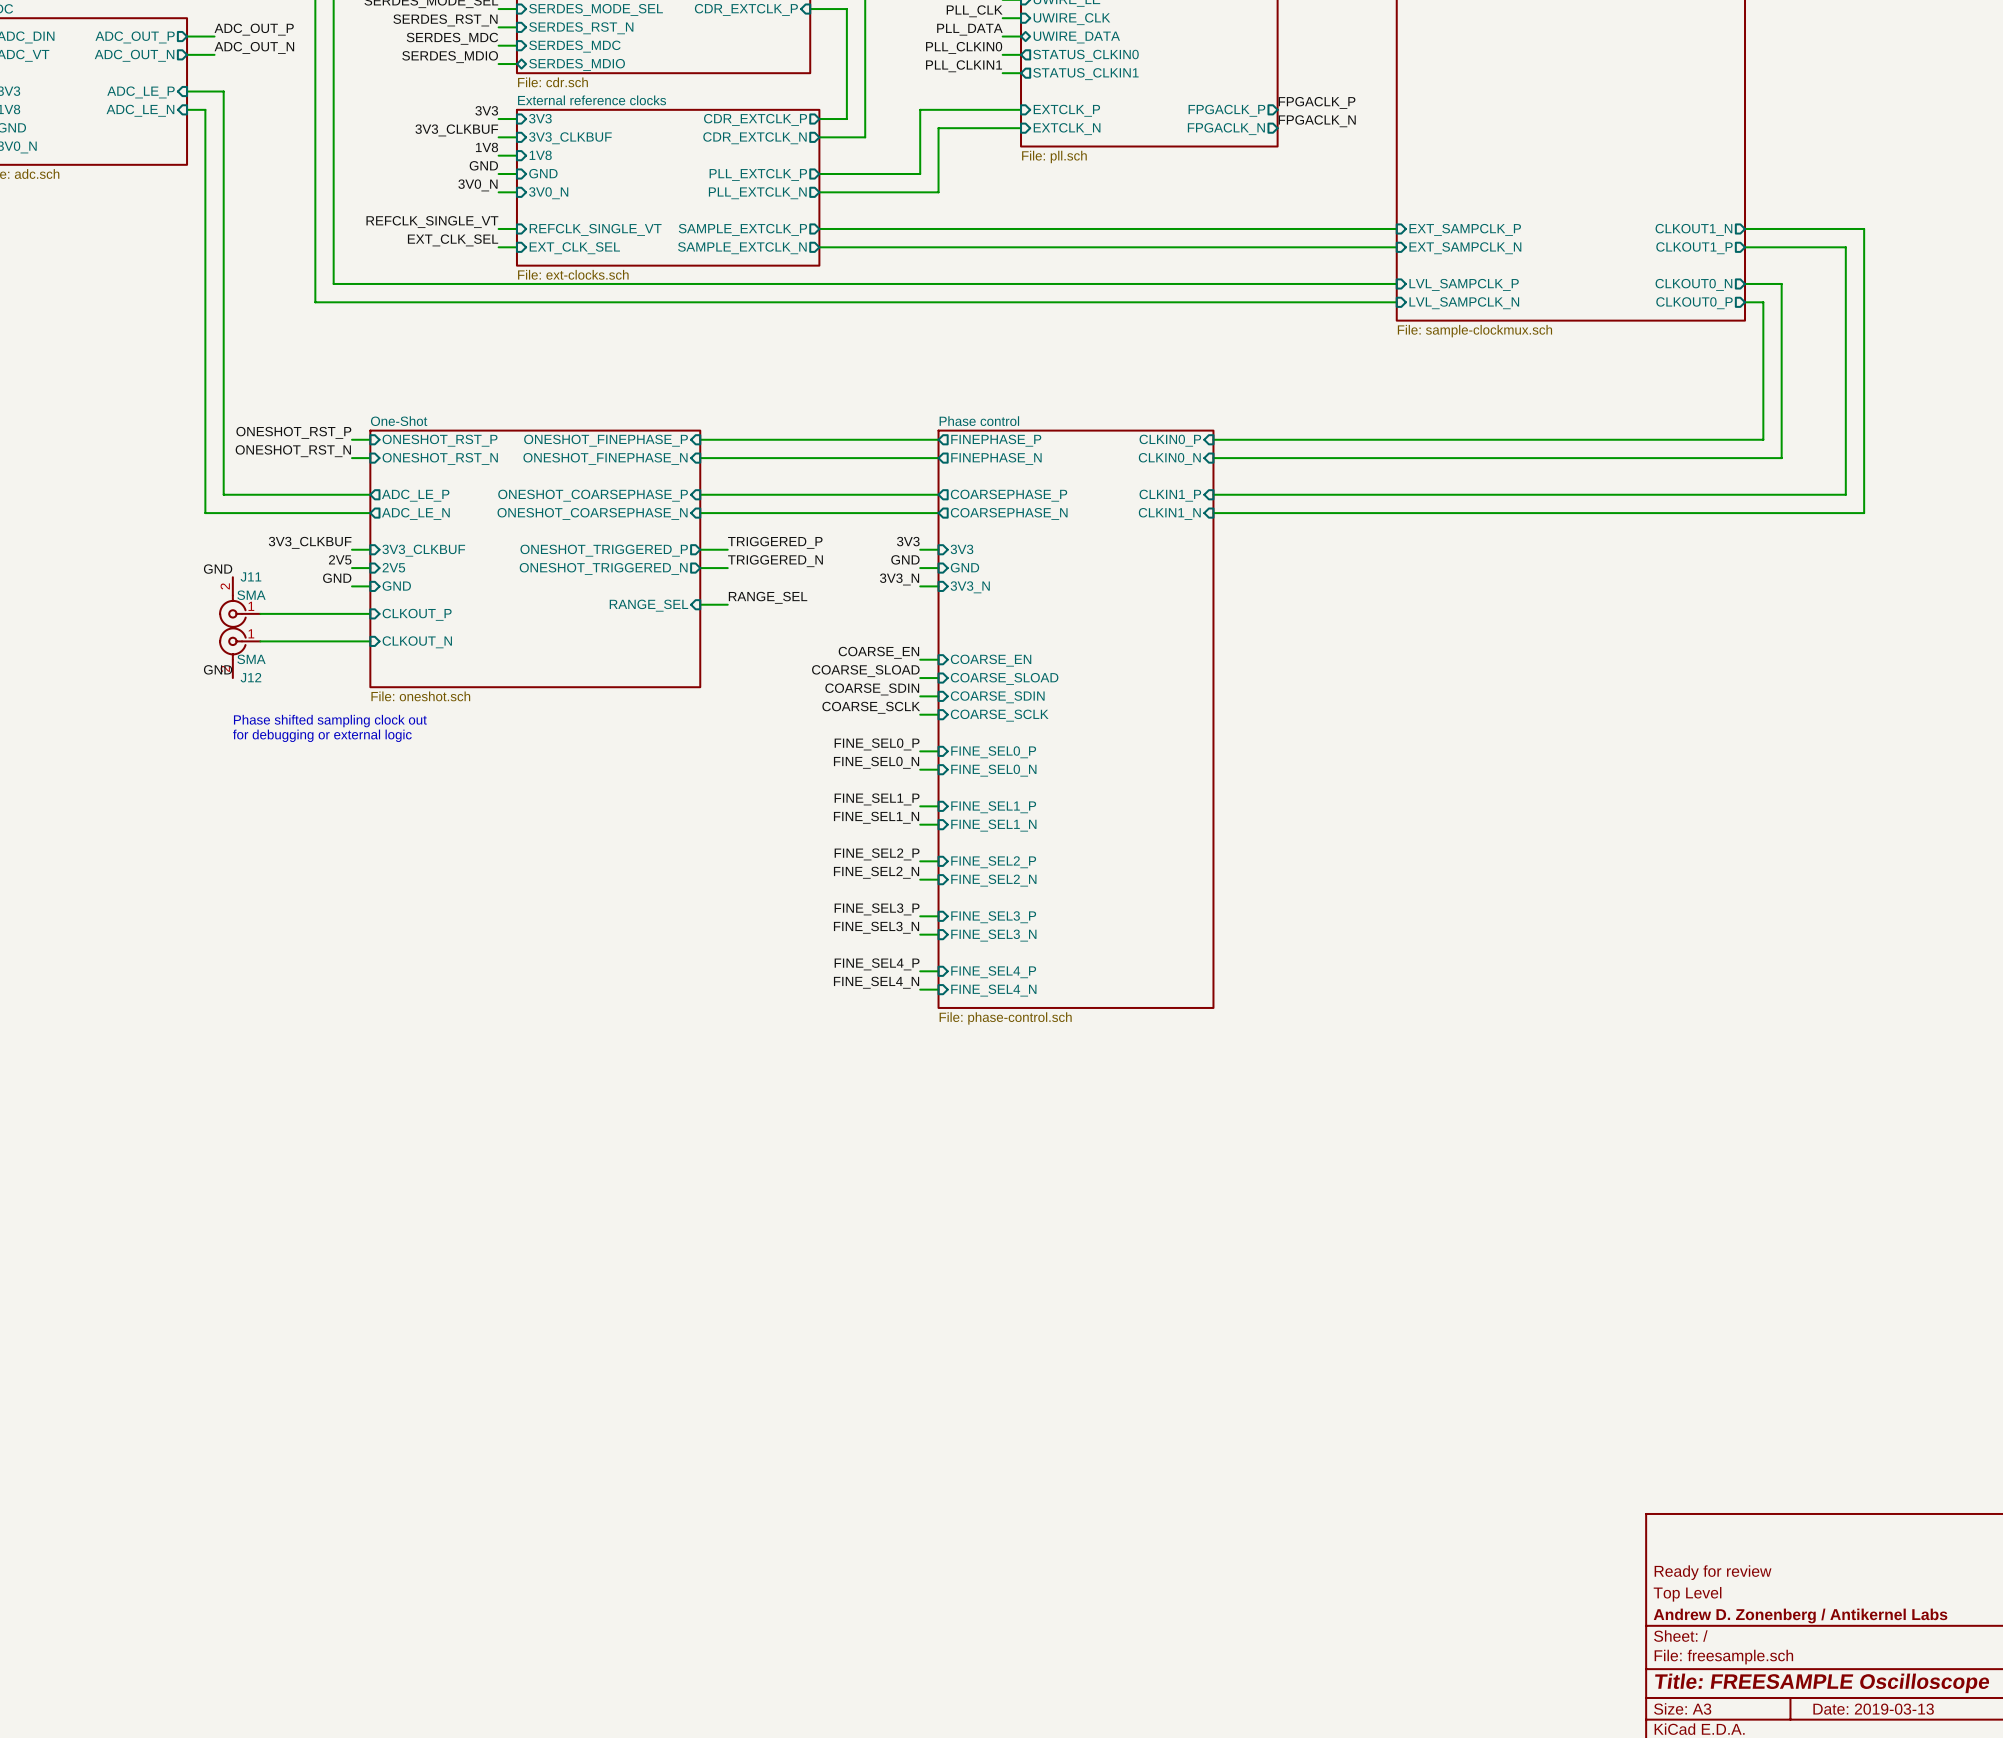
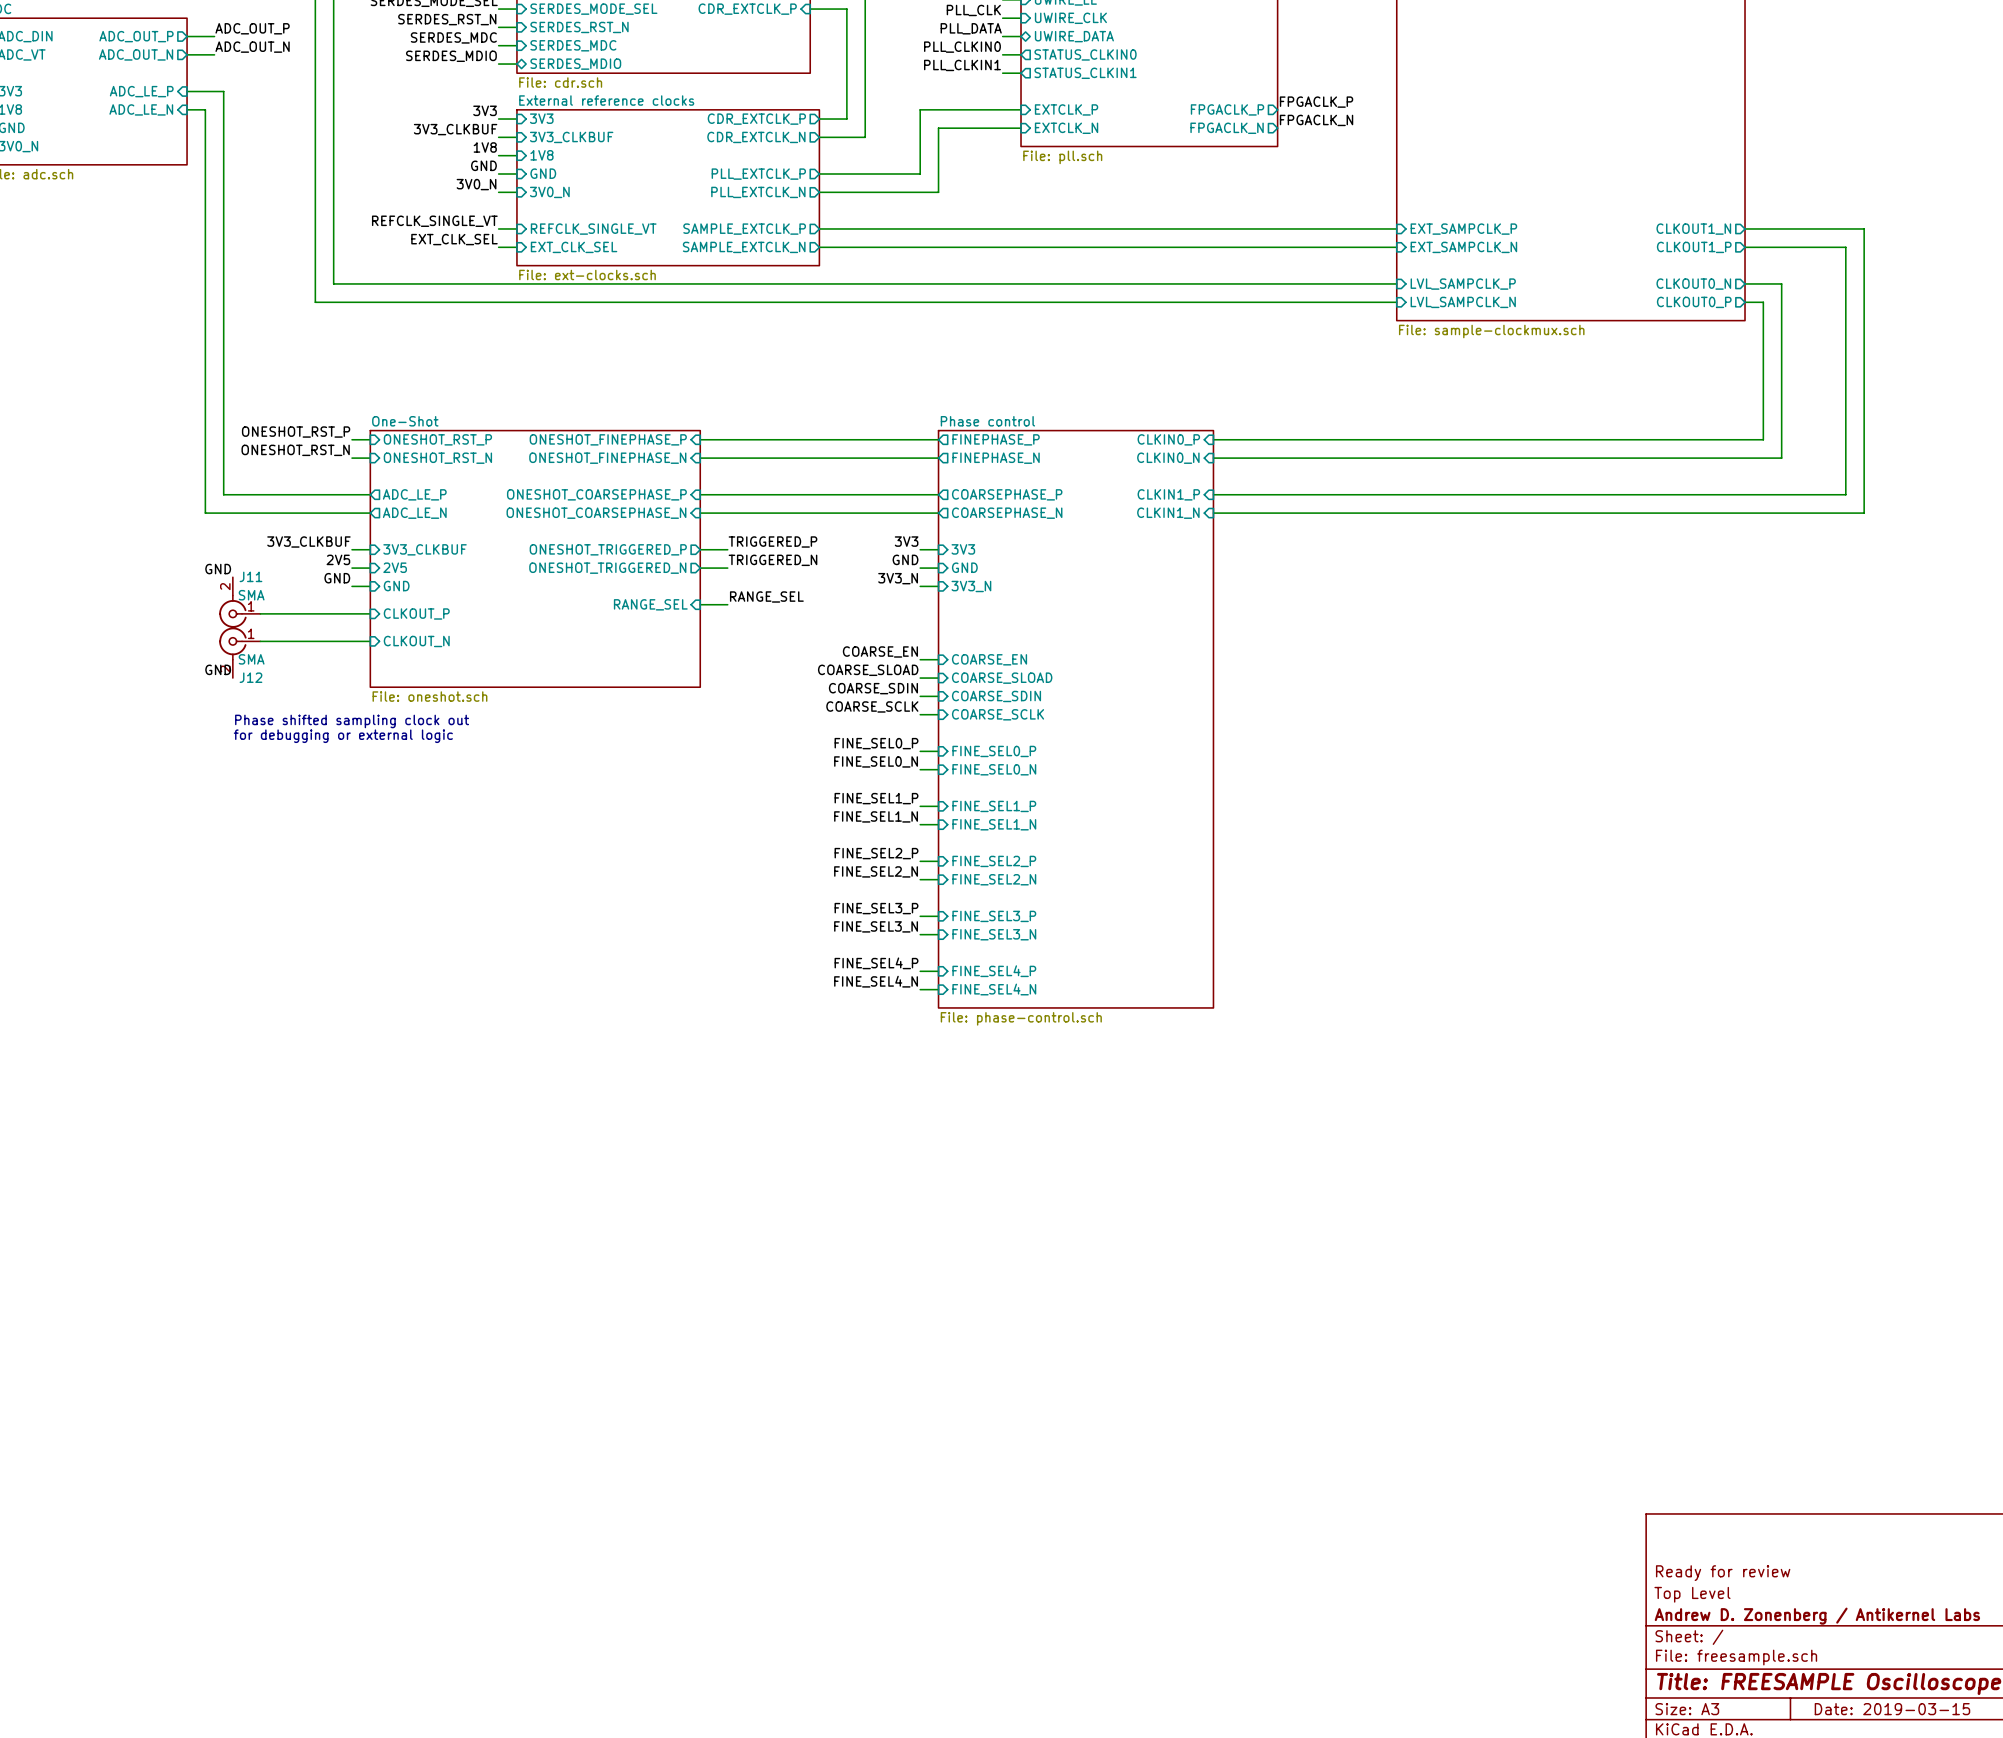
title block: Date: 2019-03-13 (1873, 1709) -> Date: 2019-03-15 (1892, 1709)

